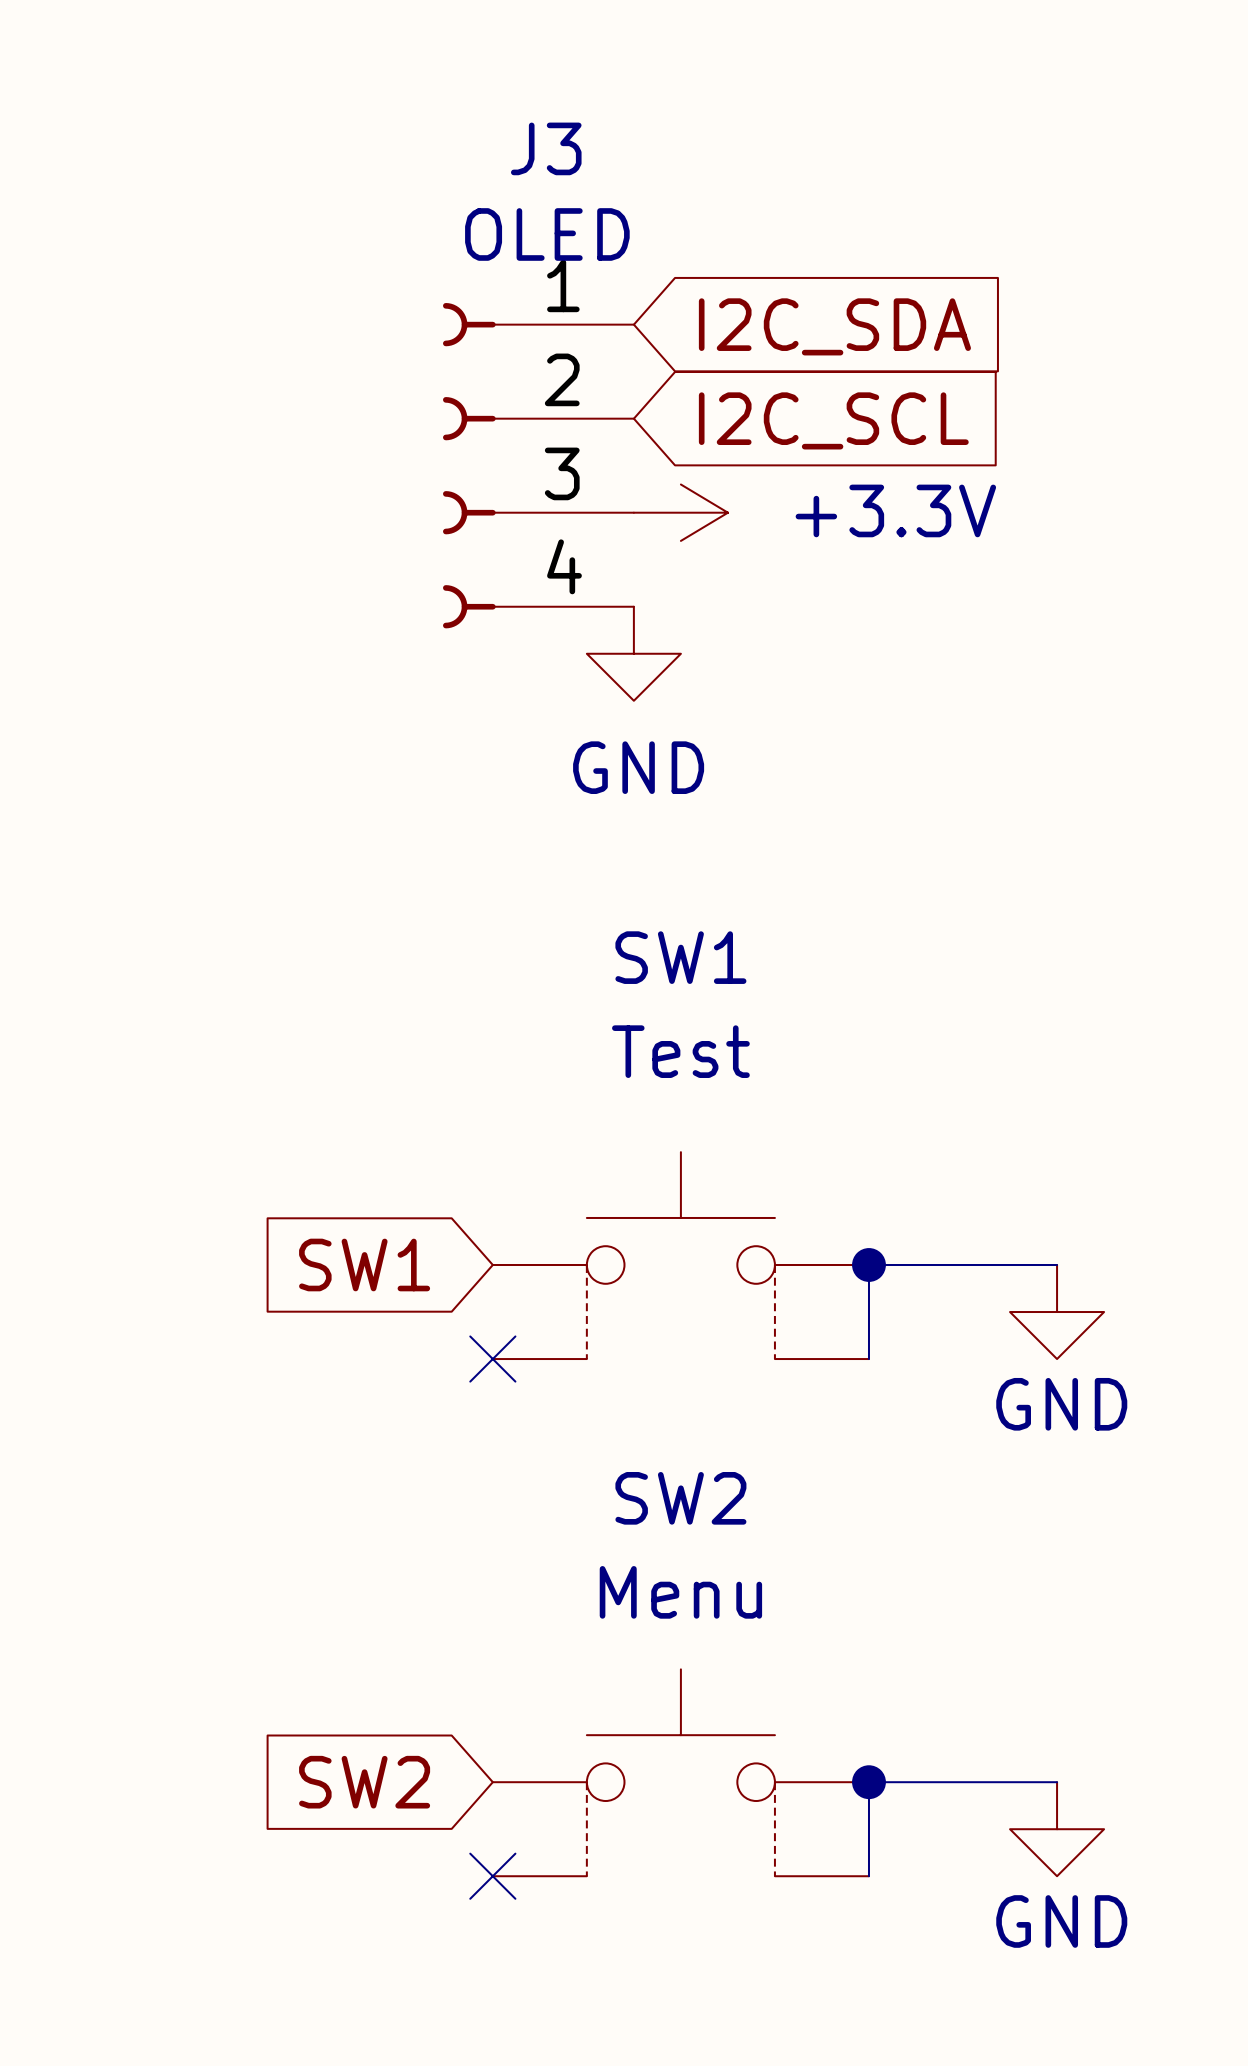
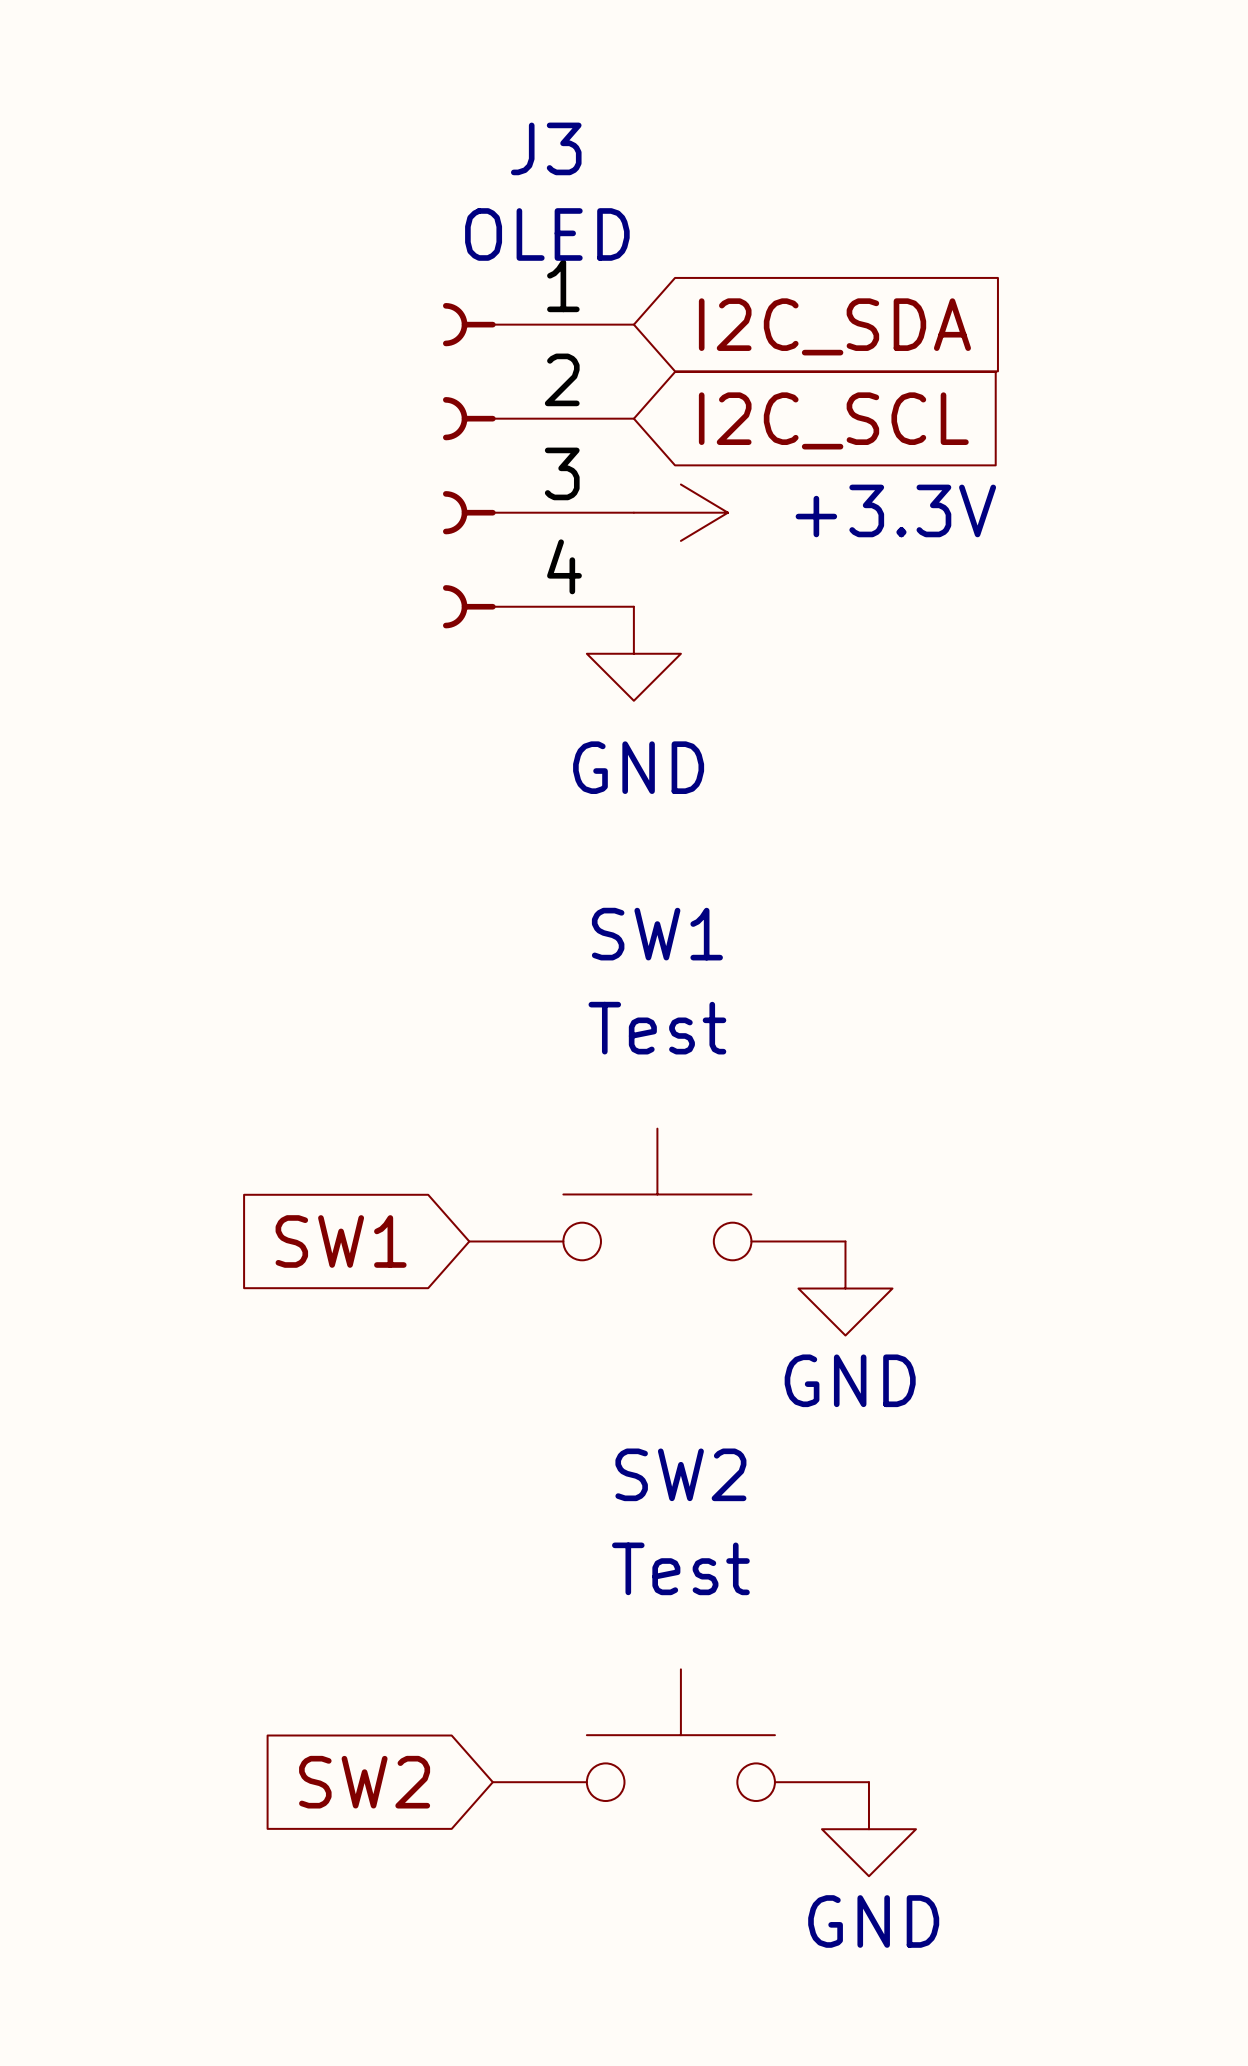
SW1 symbol: [492, 1152, 869, 1360] -> [469, 1128, 846, 1261]
global label position: SW1 (364, 1264) -> SW1 (341, 1241)
junction: (868, 1264) -> none
wire: (1057, 1264) (868, 1264) (868, 1359) -> none
power symbol position: GND (1057, 1312) -> GND (845, 1288)
no-connect mark: (492, 1359) -> none
SW2 value: Menu (680, 1592) -> Test (680, 1568)
SW2 symbol: [492, 1669, 869, 1877] -> [492, 1669, 869, 1802]
junction: (868, 1782) -> none
wire: (1057, 1782) (868, 1782) (868, 1876) -> none
power symbol position: GND (1057, 1829) -> GND (868, 1829)
no-connect mark: (492, 1876) -> none

